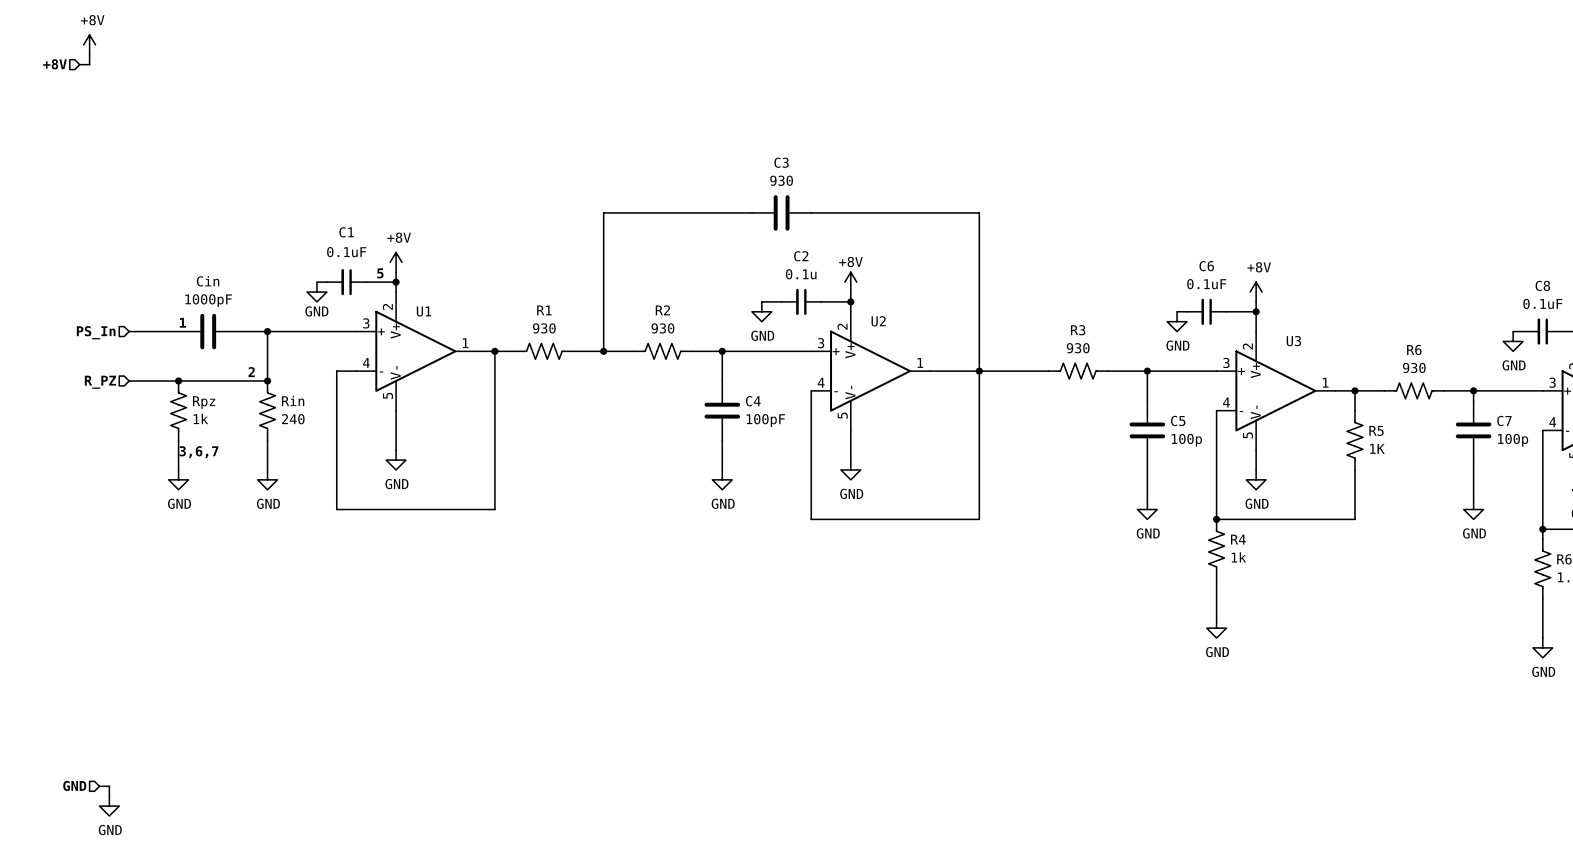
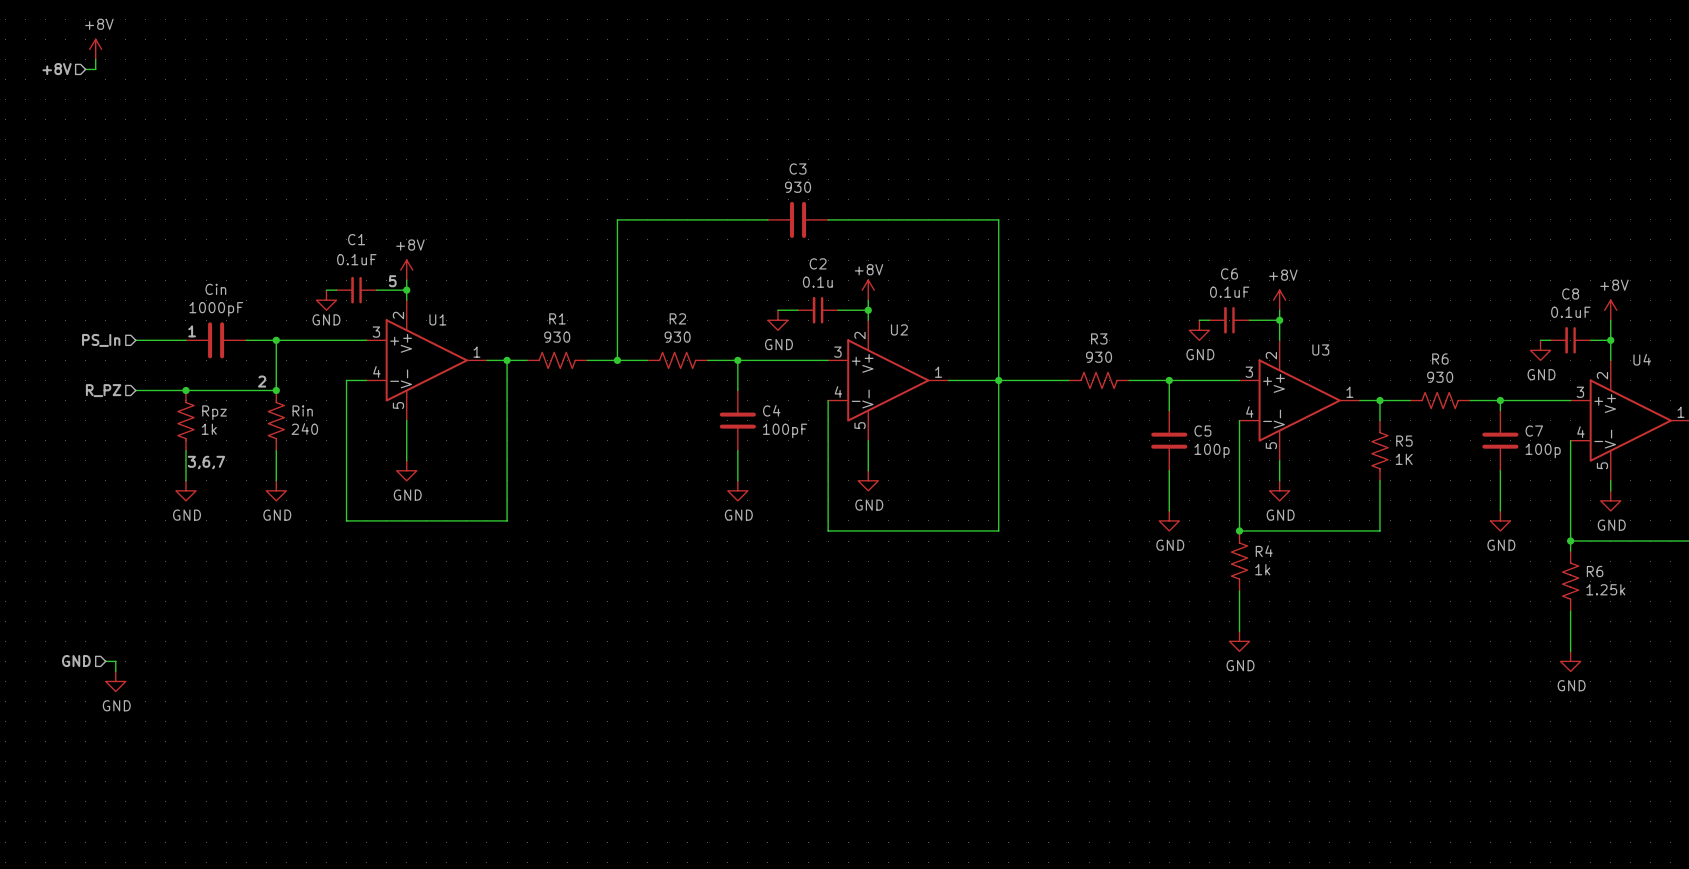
hierarchical label position: GND (74, 785) -> GND (76, 661)
wire: (99, 786) (109, 786) (109, 796) -> (105, 661) (115, 661) (115, 671)
power symbol position: GND (109, 806) -> GND (115, 681)

